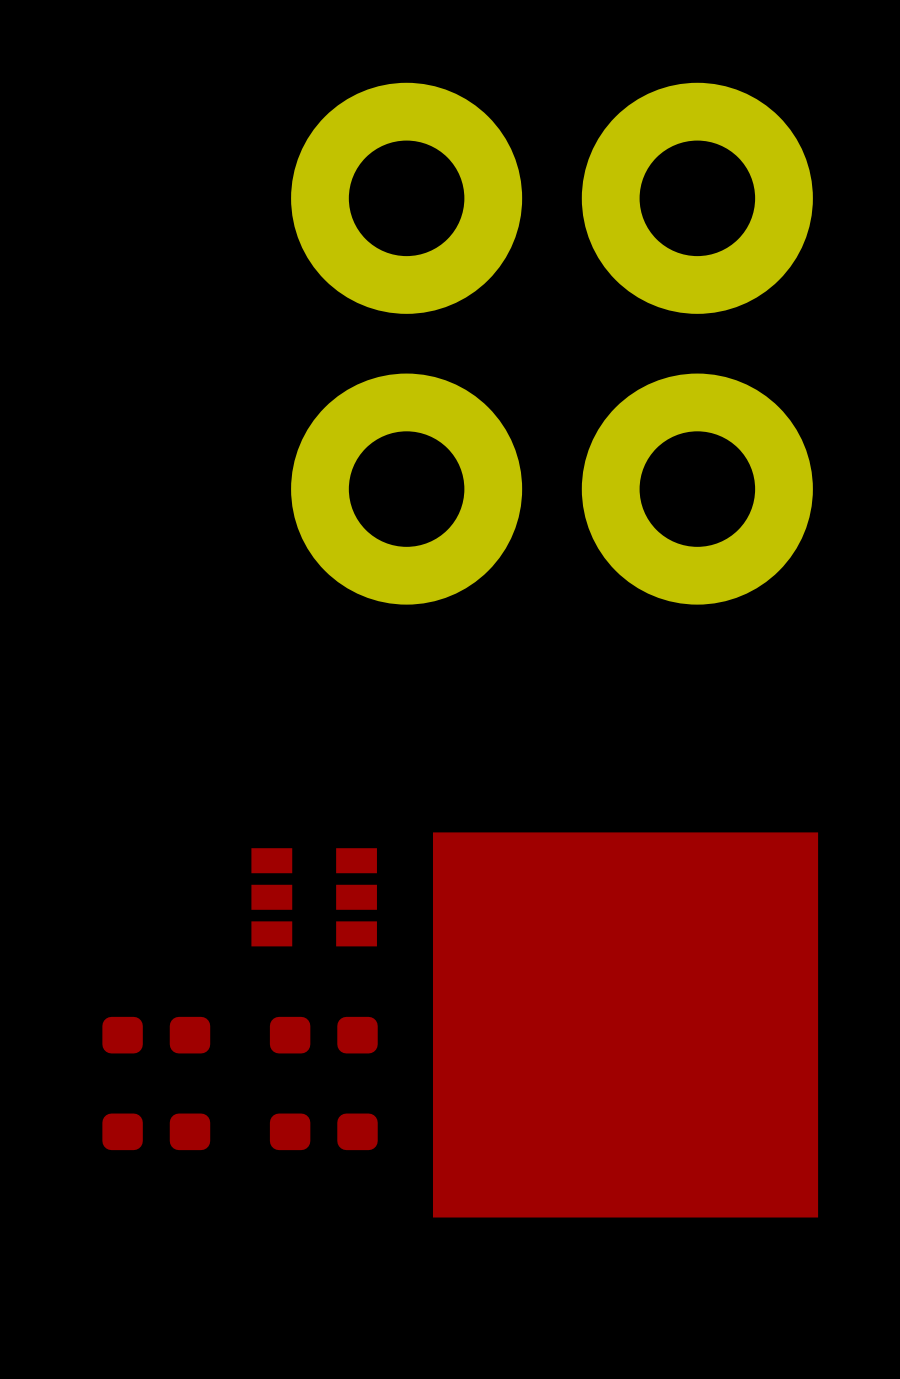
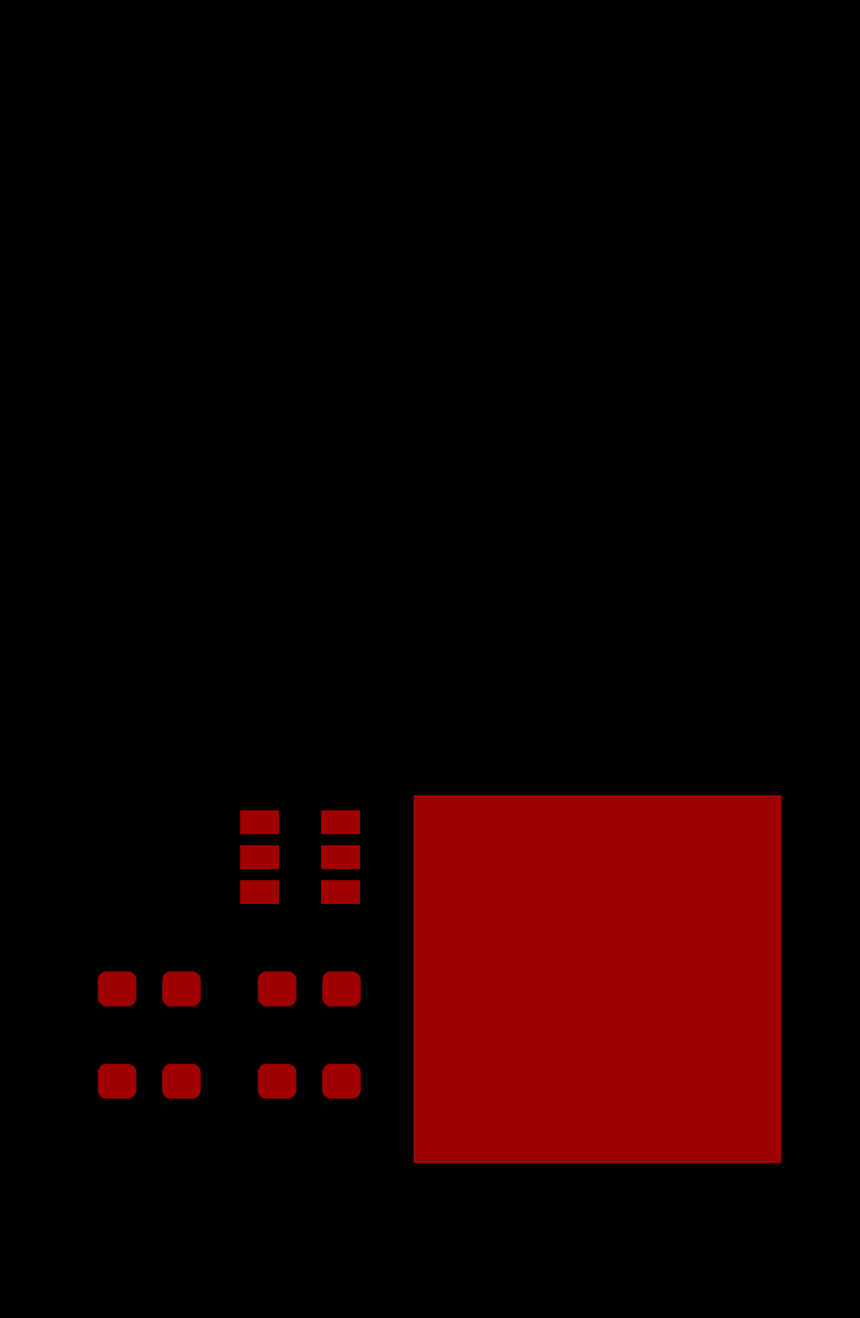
part: (406, 198) -> none
part: (697, 198) -> none
part: (406, 489) -> none
part: (697, 489) -> none

